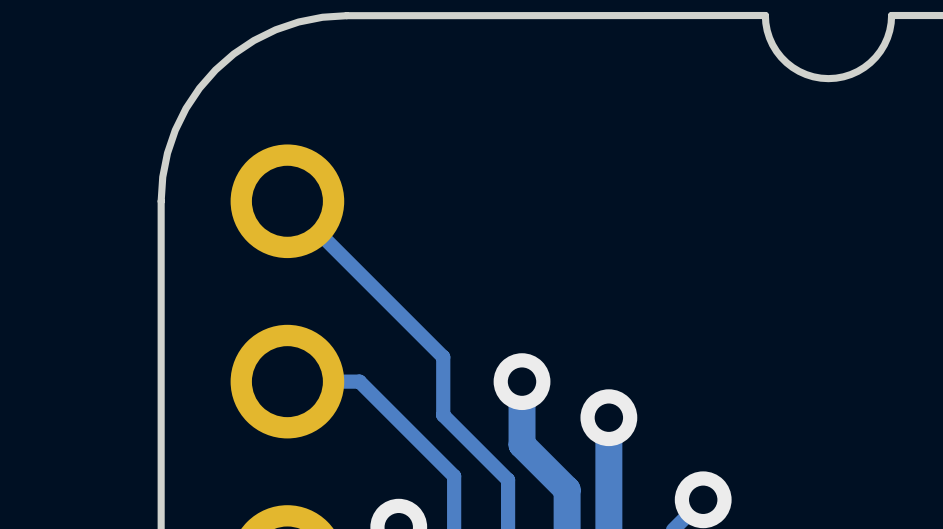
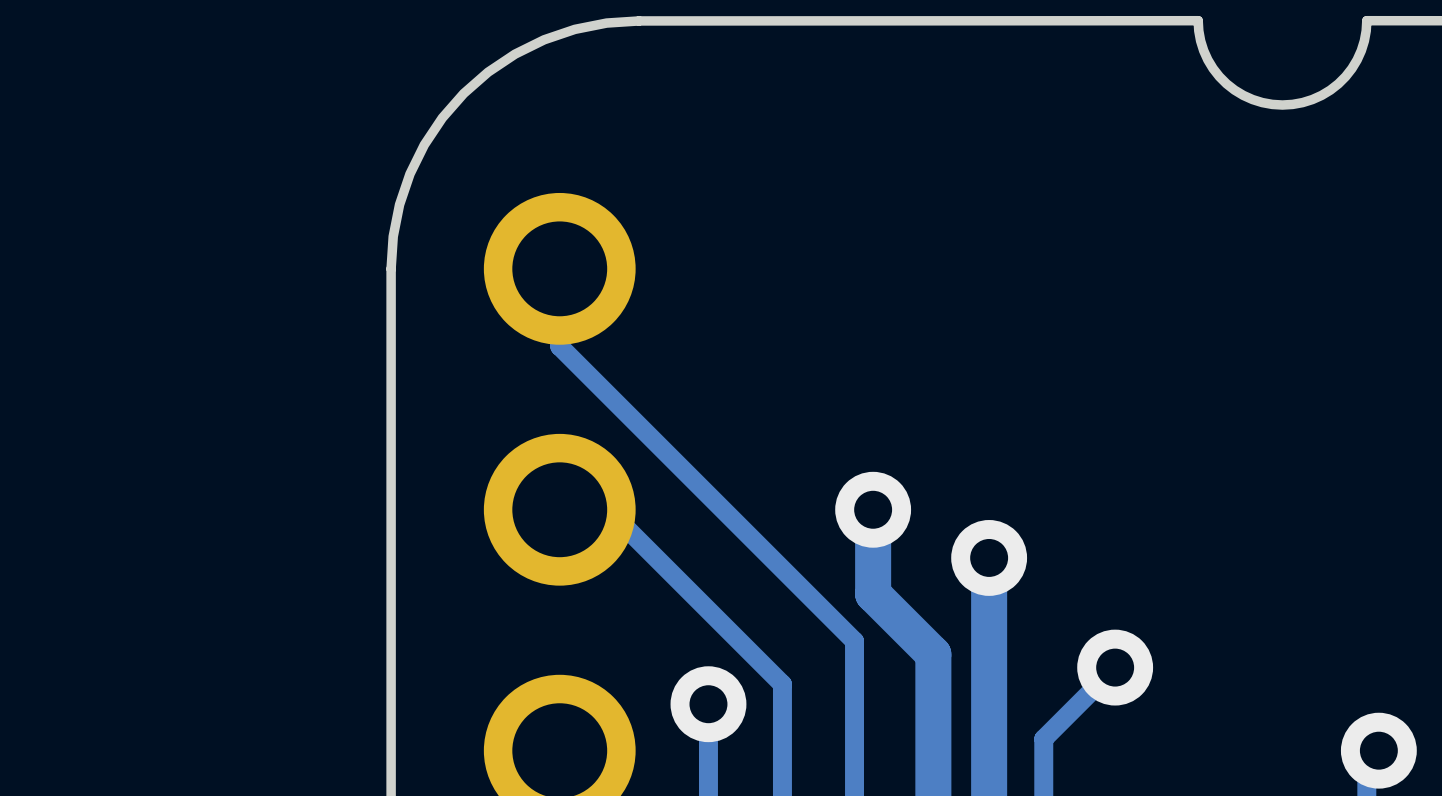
track: (287, 201) (443, 357) (443, 415) -> (559, 268) (559, 346) (767, 554)
track: (287, 381) (359, 381) (454, 476) (454, 512) -> (607, 509) (782, 684)

